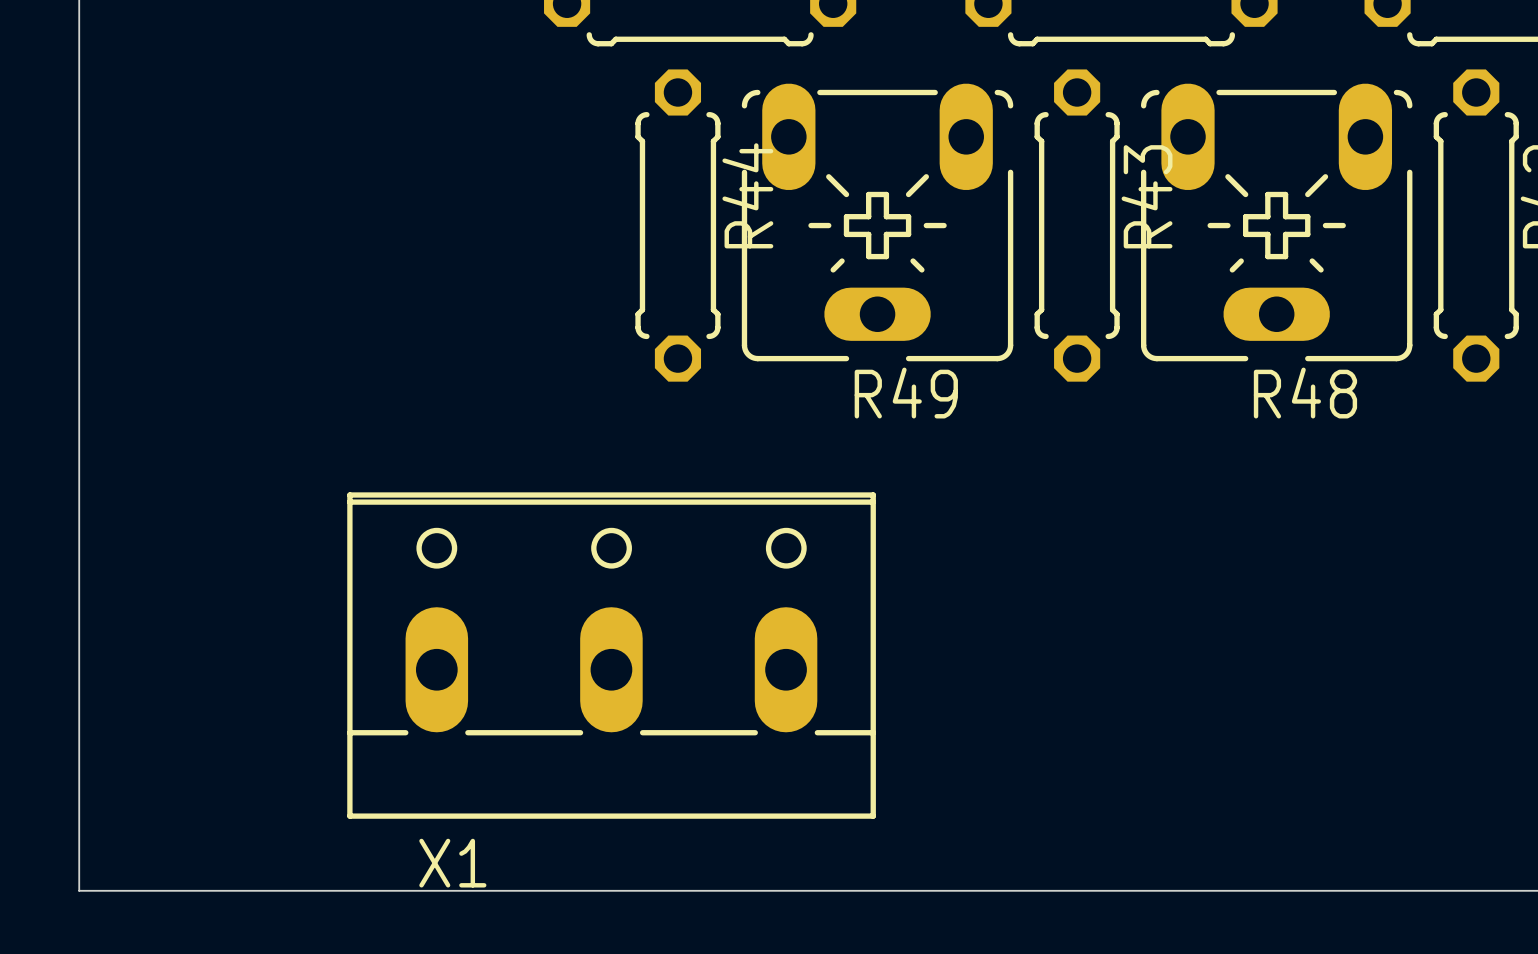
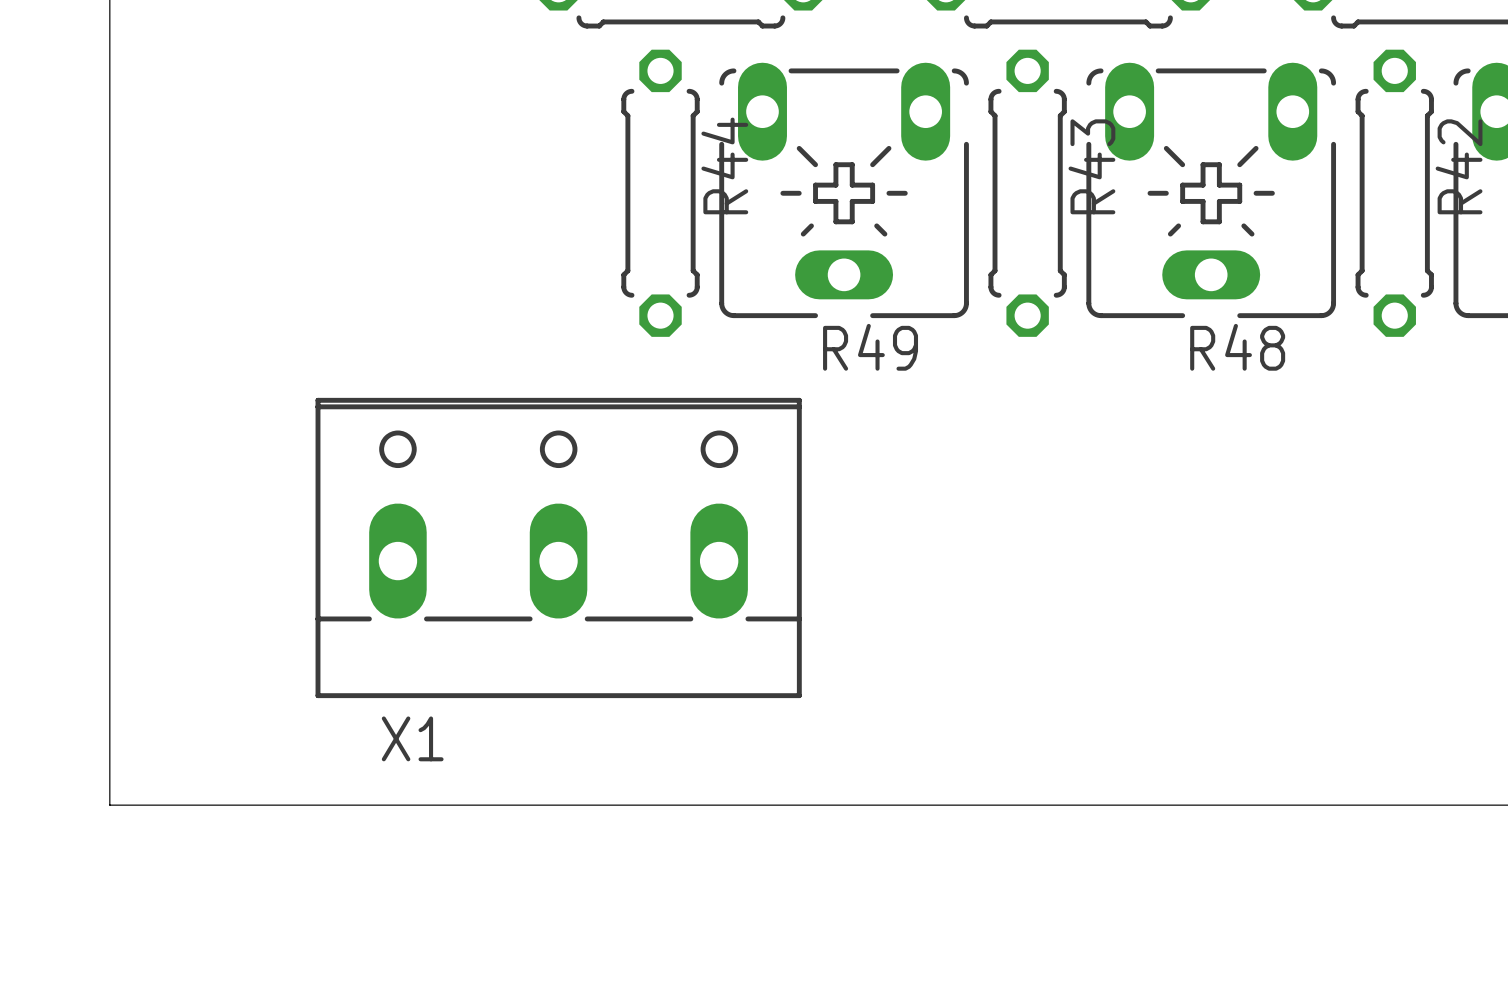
X1 position: (611, 655) -> (558, 547)

